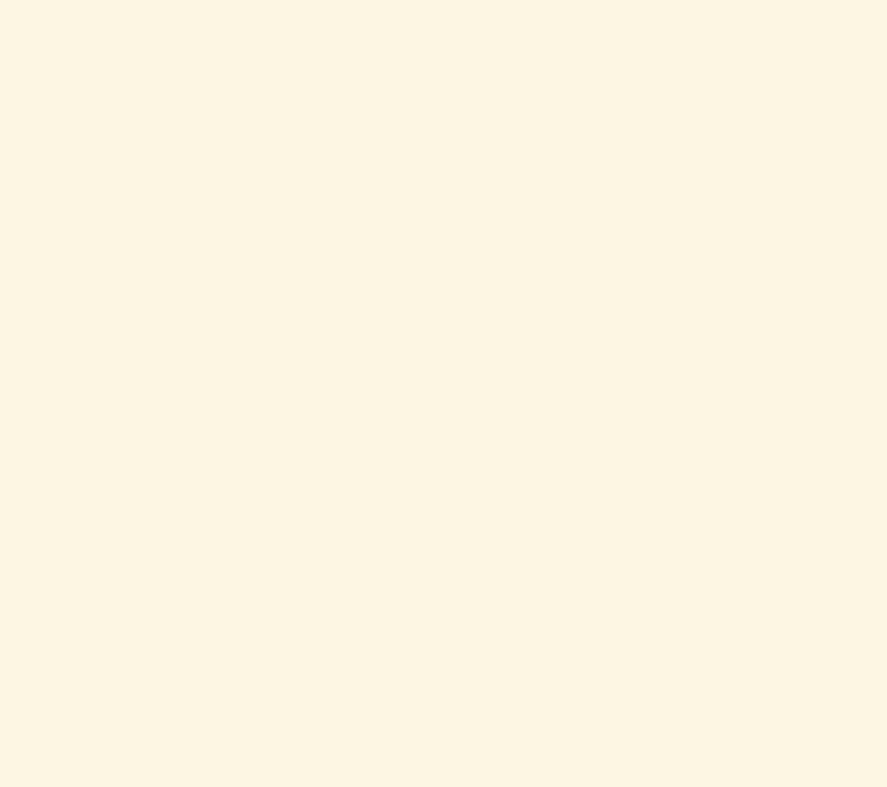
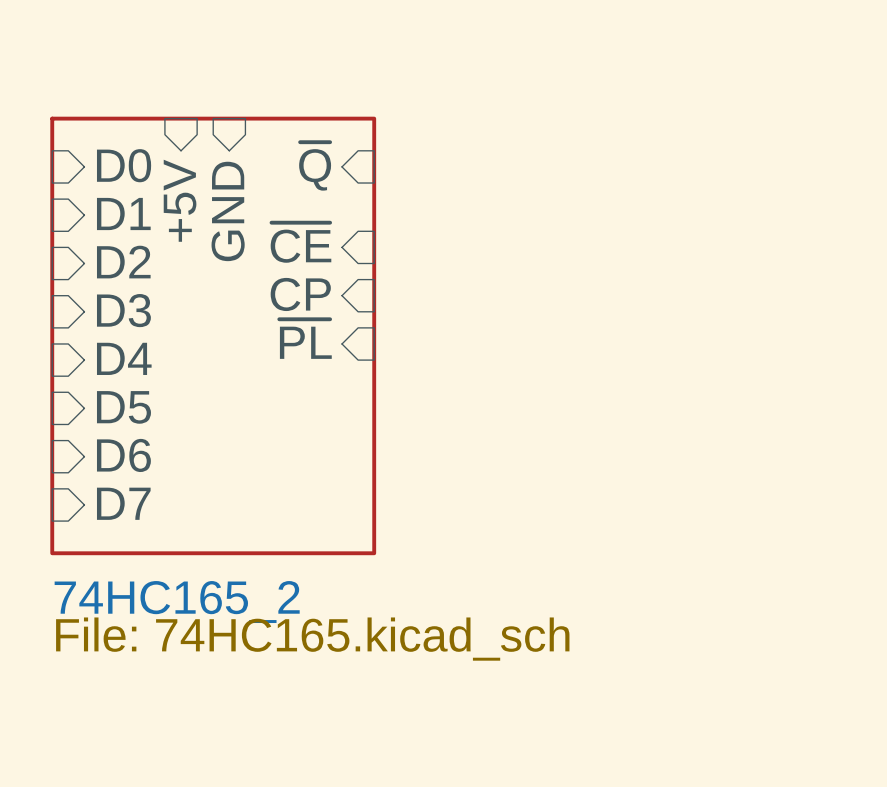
sheet pin: none -> D0 (124, 165)
sheet pin: none -> ~{Q} (315, 166)
sheet pin: none -> +5V (180, 200)
sheet pin: none -> GND (228, 211)
sheet pin: none -> D1 (123, 214)
sheet pin: none -> ~{CE} (300, 242)
sheet pin: none -> D2 (123, 262)
sheet pin: none -> CP (300, 294)
sheet pin: none -> D3 (123, 310)
sheet 74HC165_2: none -> File: 74HC165.kicad_sch (213, 335)
sheet pin: none -> ~{PL} (305, 339)
sheet pin: none -> D4 (124, 358)
sheet pin: none -> D5 (123, 407)
sheet pin: none -> D6 (123, 455)
sheet pin: none -> D7 (123, 503)

